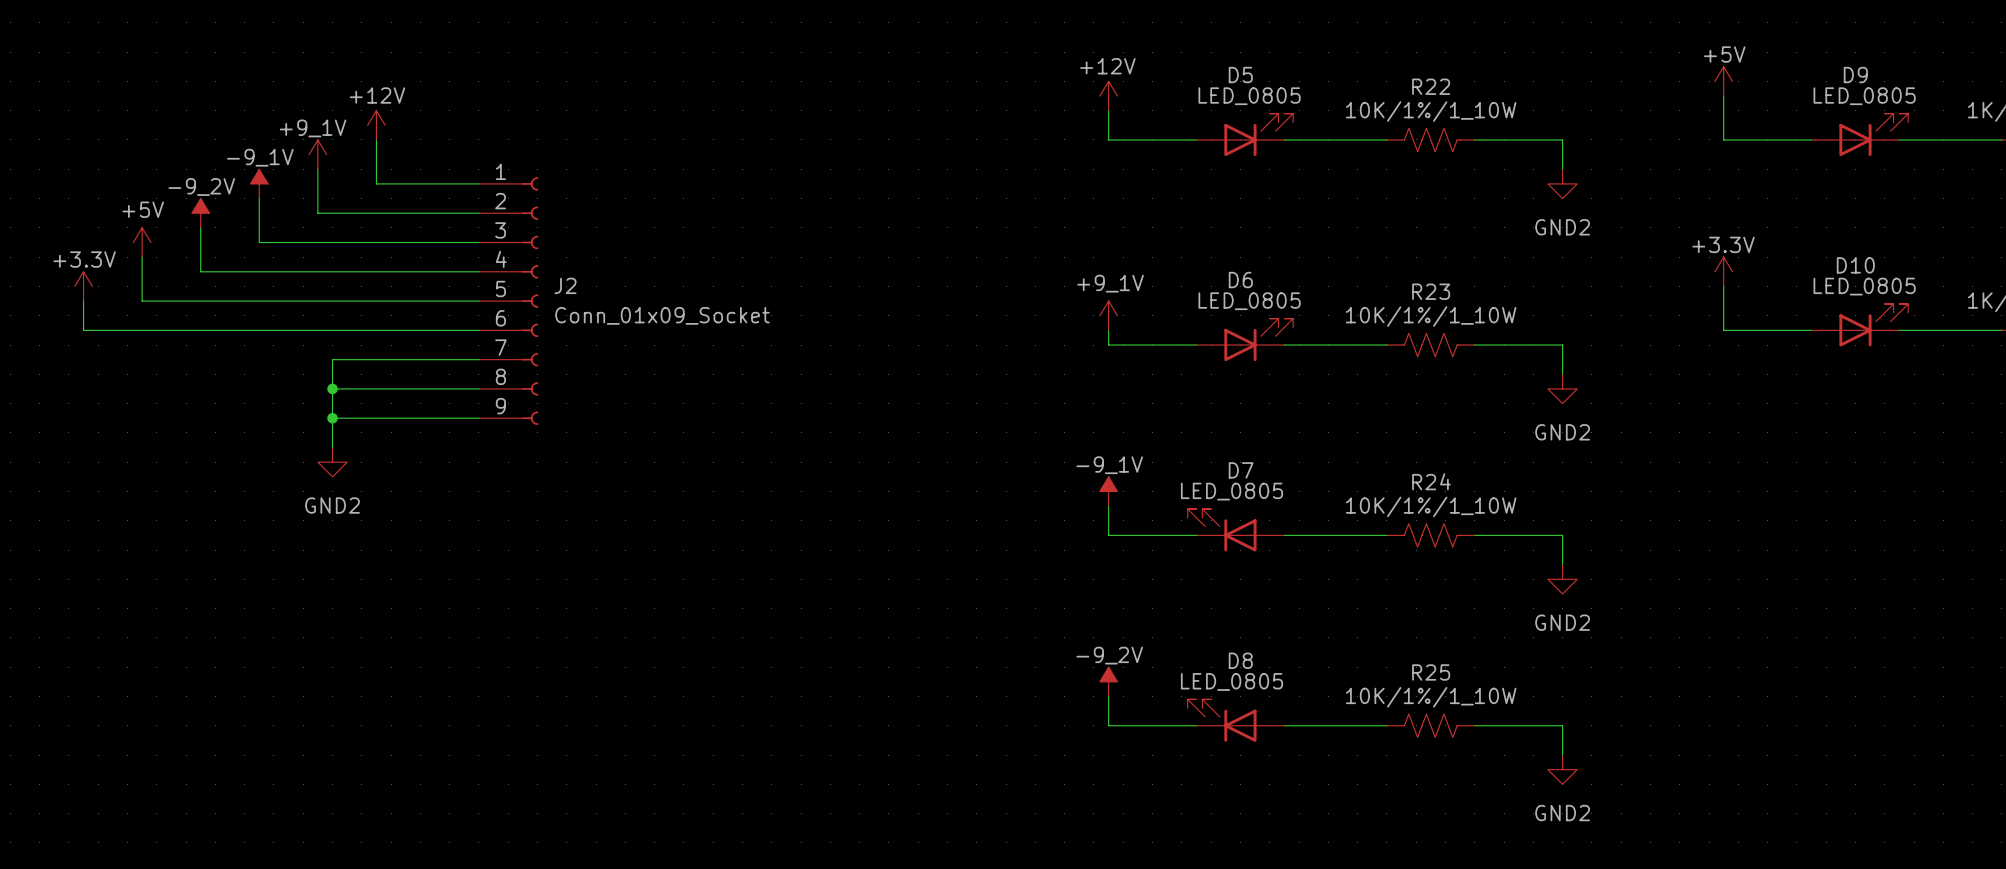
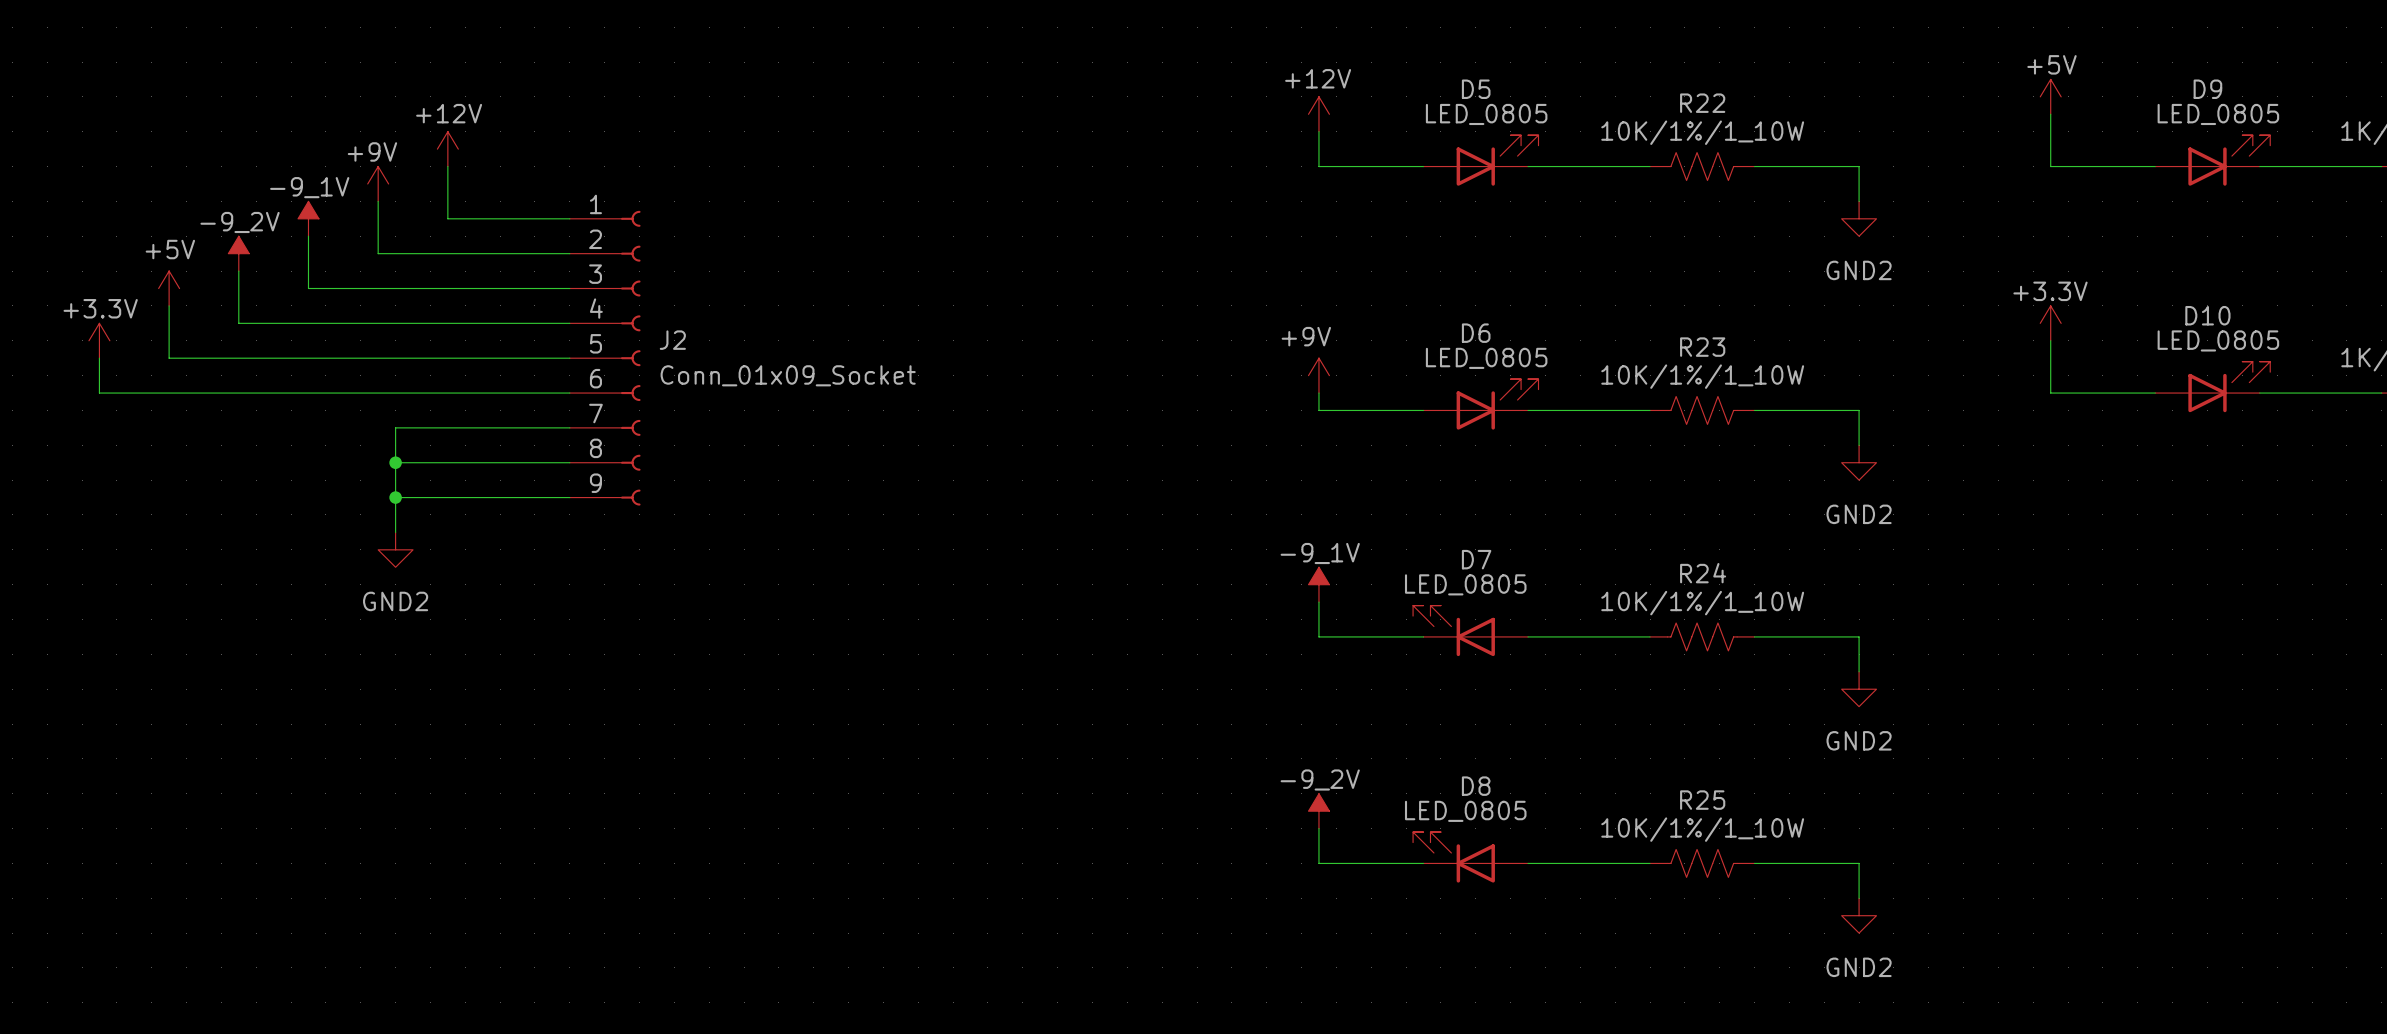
power symbol: +9_1V (317, 154) -> +9V (378, 183)
power symbol: +9_1V (1108, 315) -> +9V (1318, 375)

